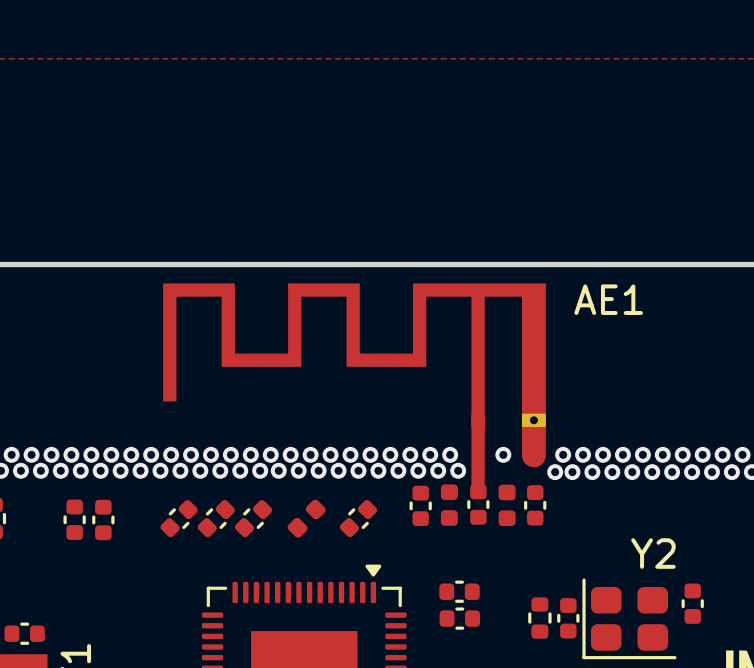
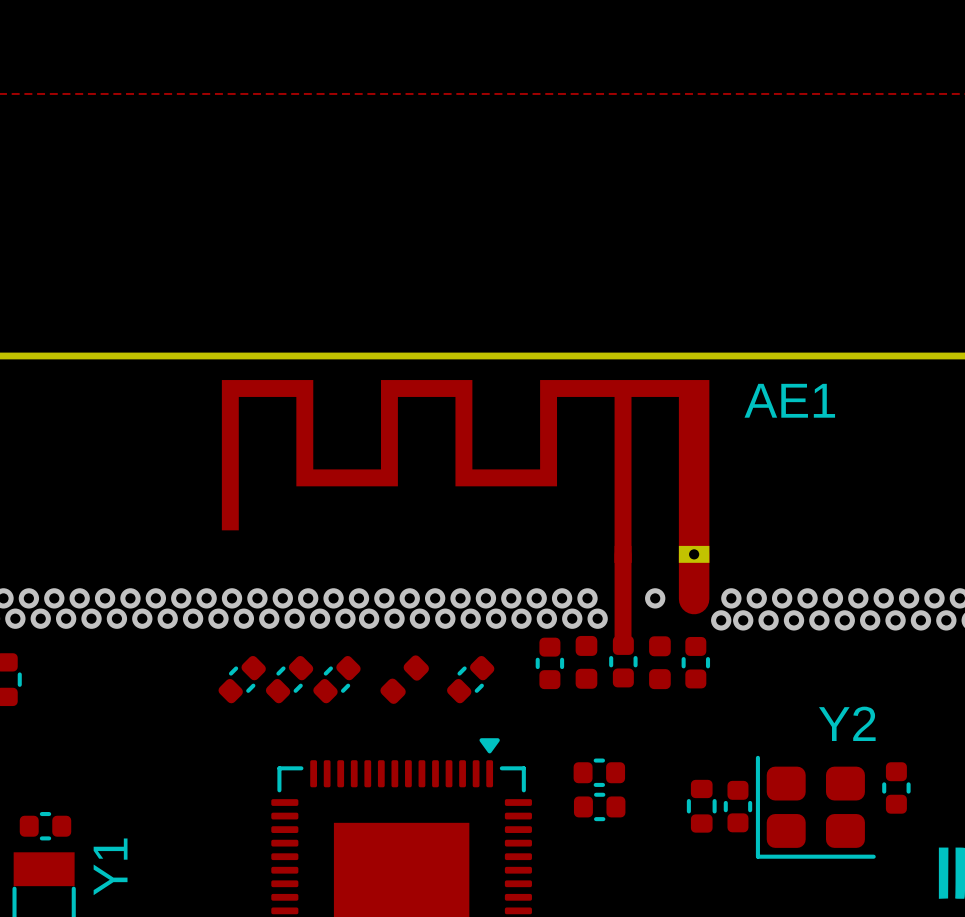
part: (74, 519) -> none
part: (103, 519) -> none

